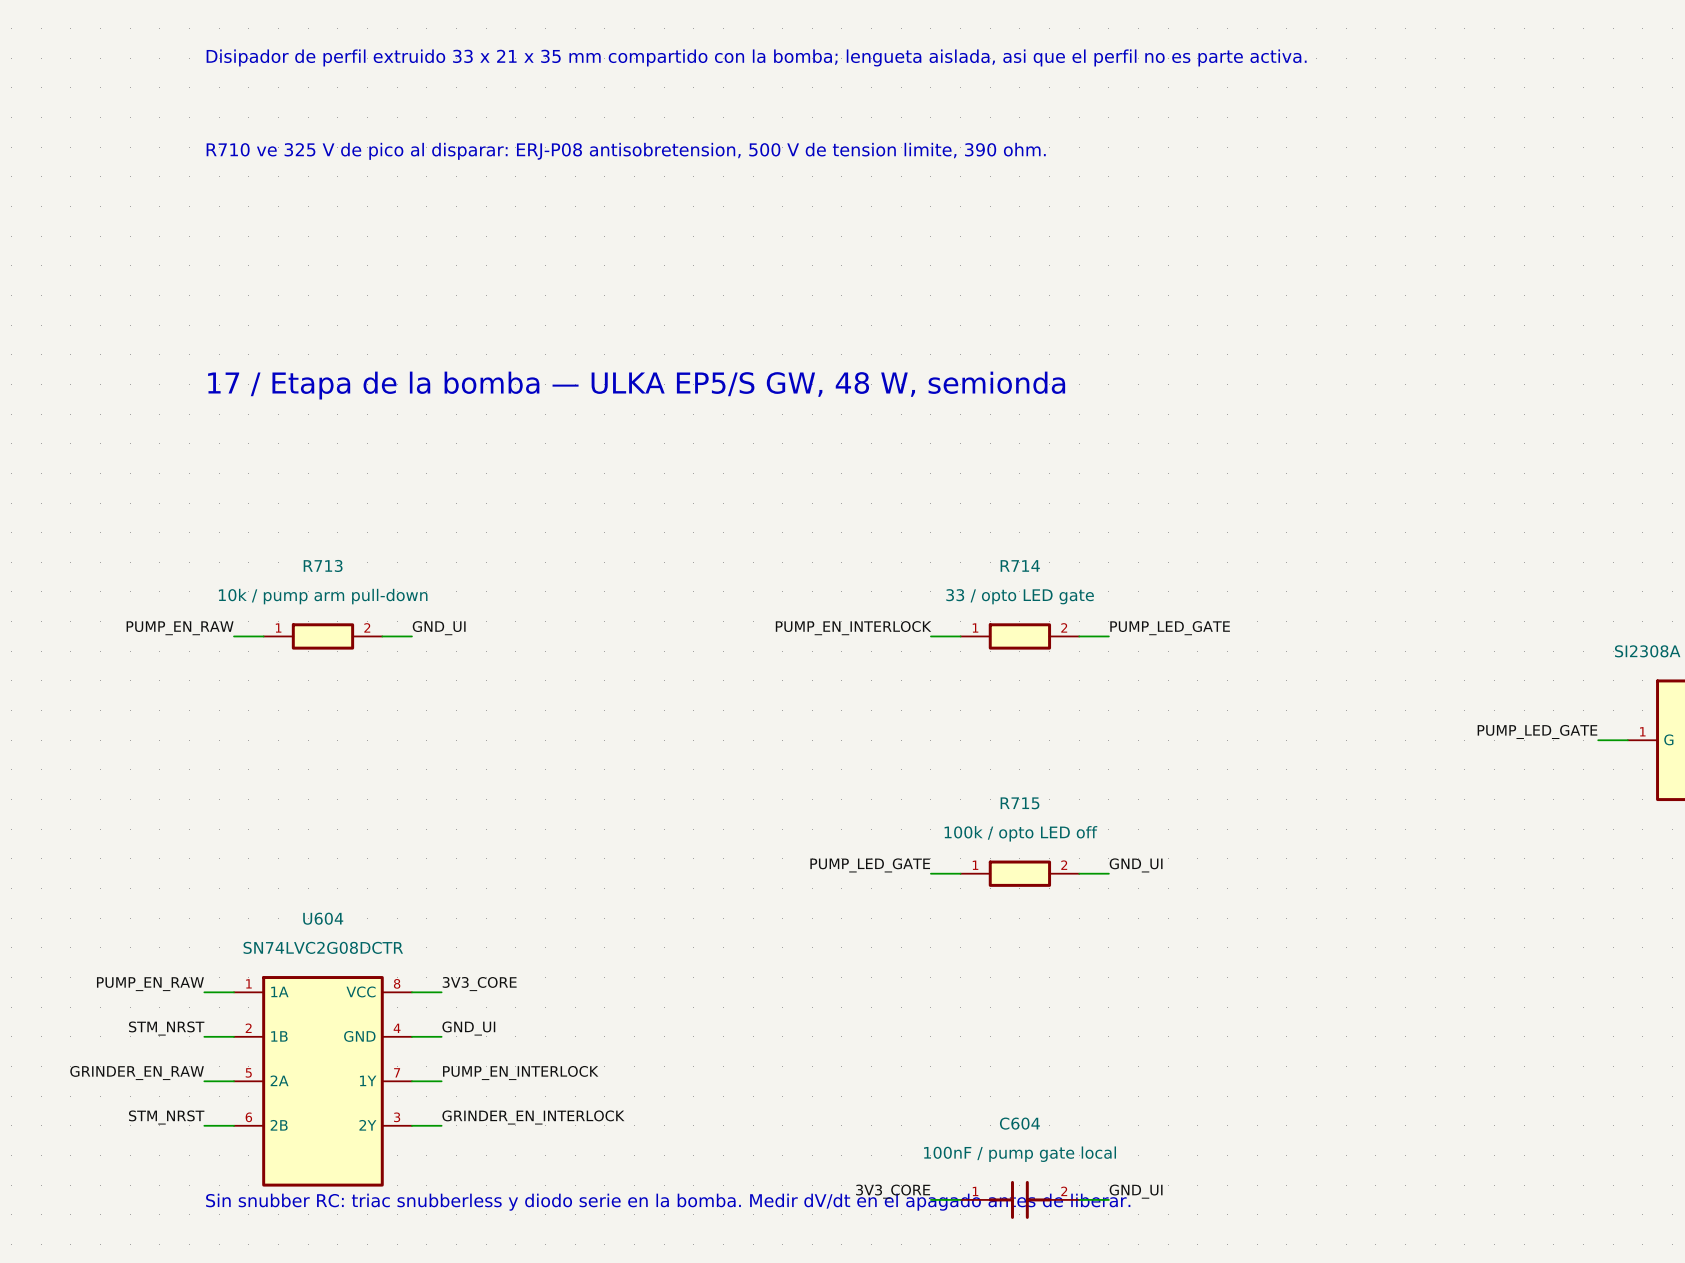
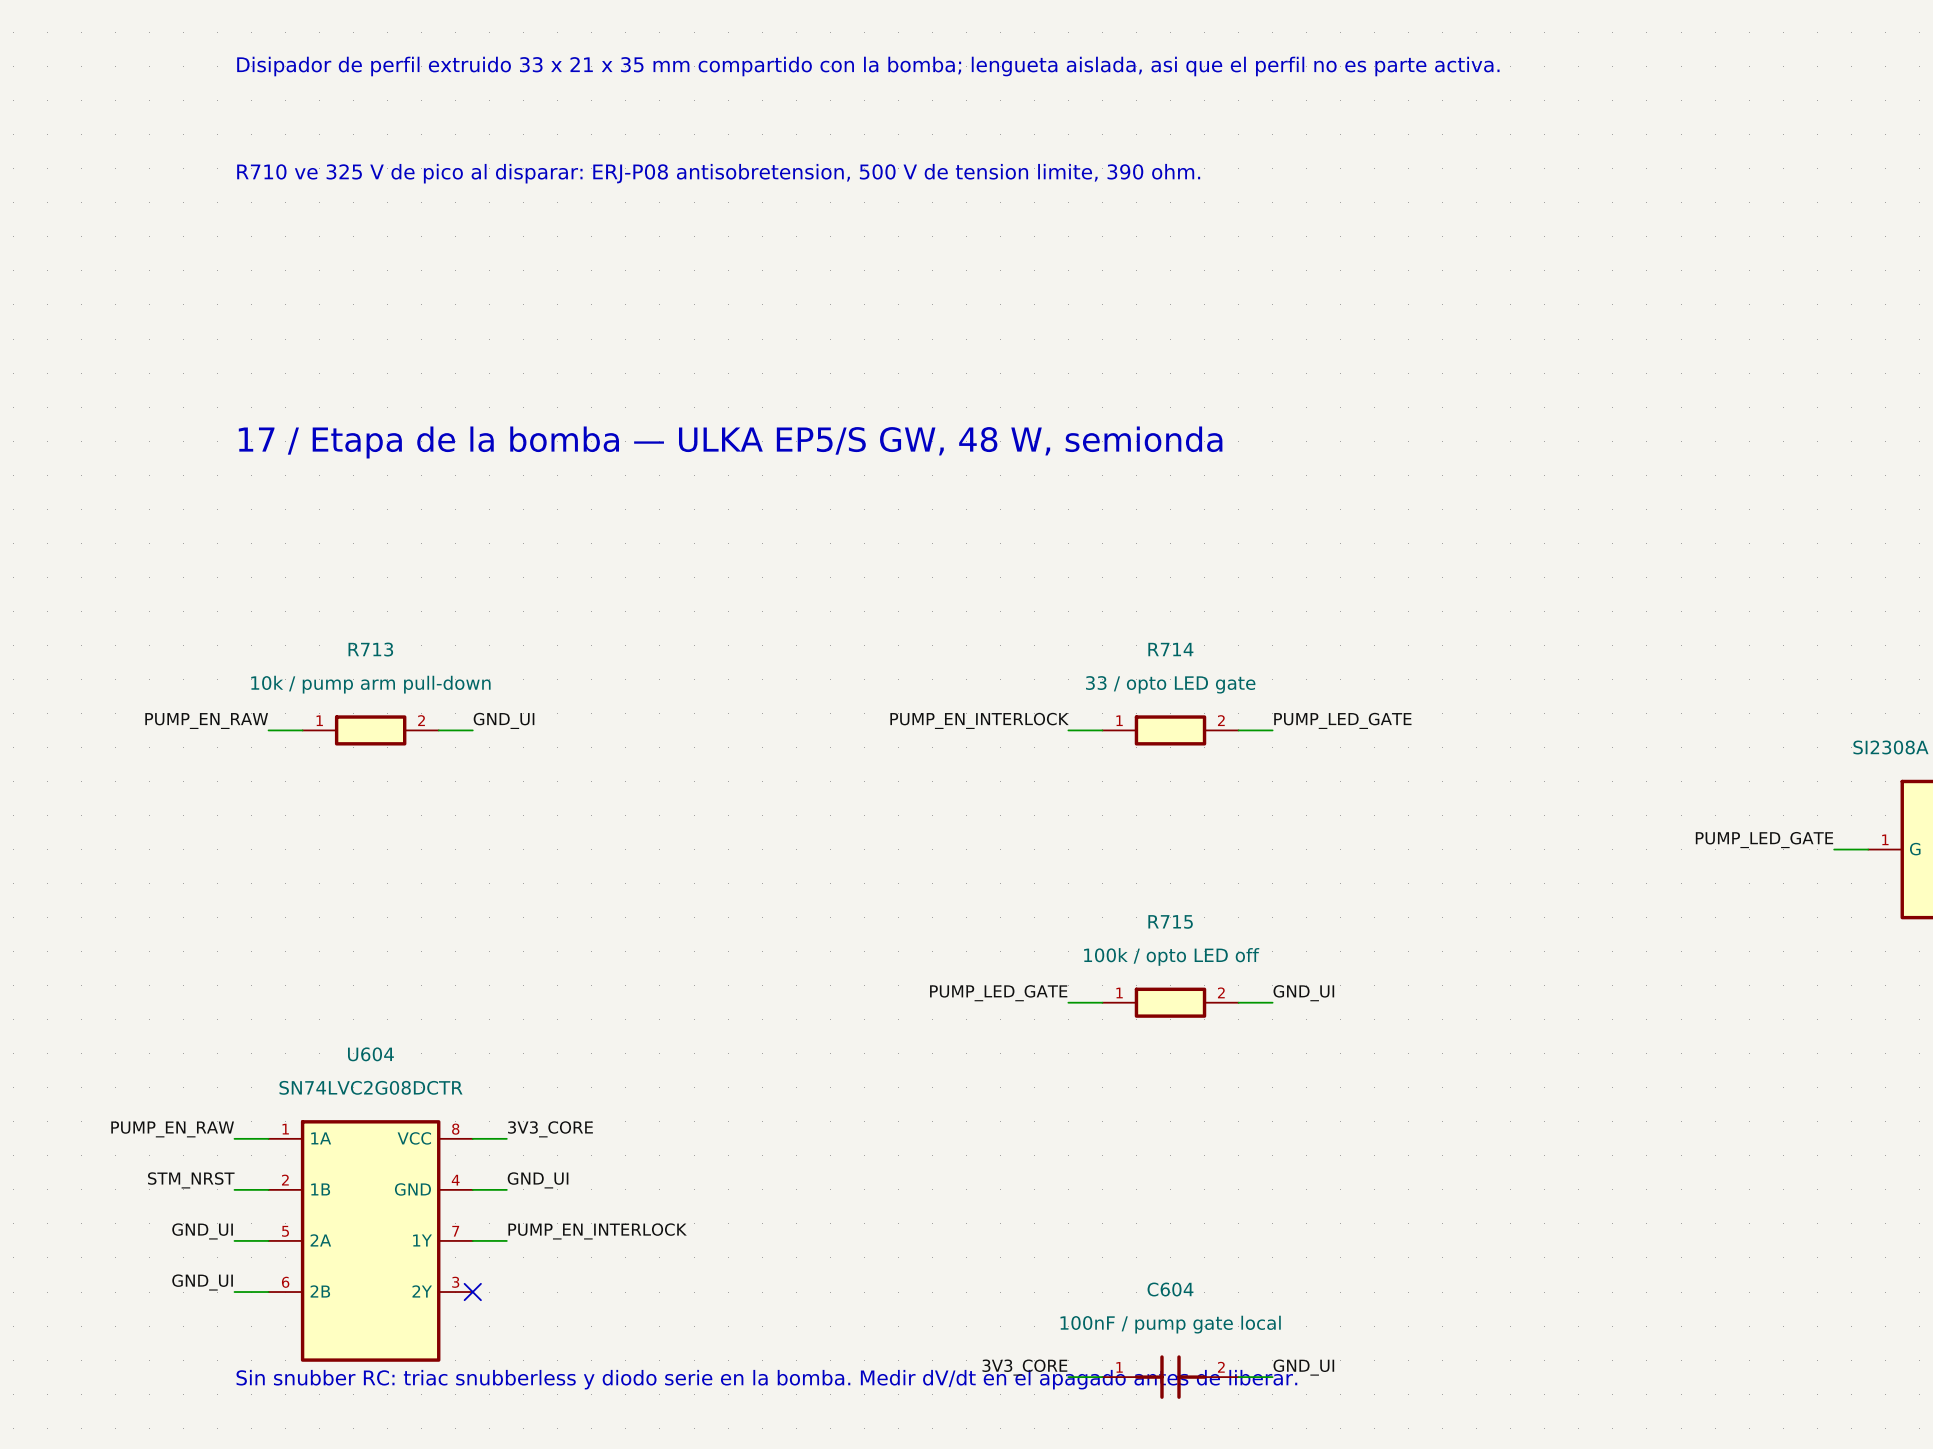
label: GRINDER_EN_RAW (137, 1073) -> GND_UI (202, 1231)
label: STM_NRST (166, 1117) -> GND_UI (202, 1282)
label: GRINDER_EN_INTERLOCK (533, 1117) -> none
wire: (411, 1125) (441, 1125) -> none
no-connect mark: none -> (472, 1292)

